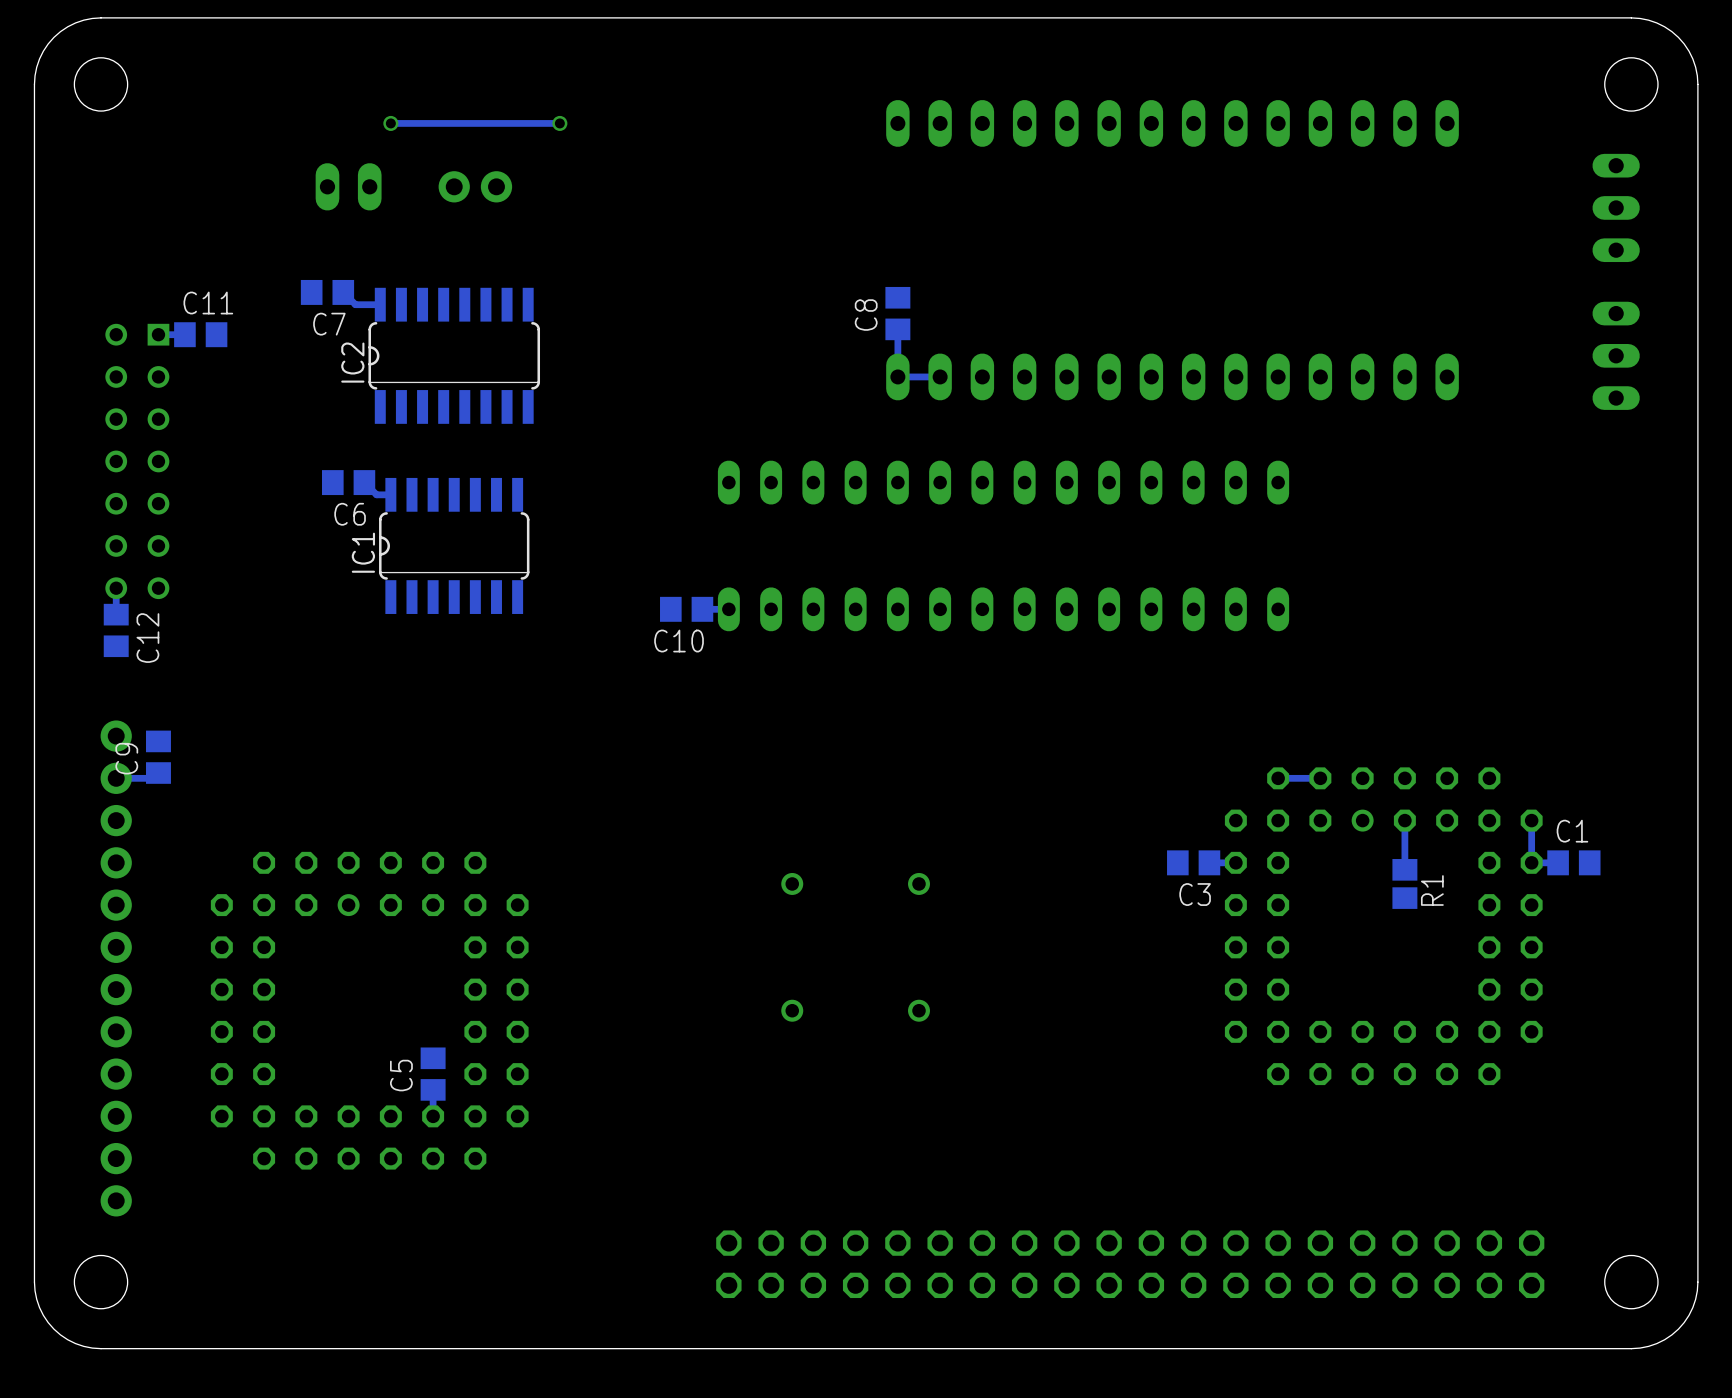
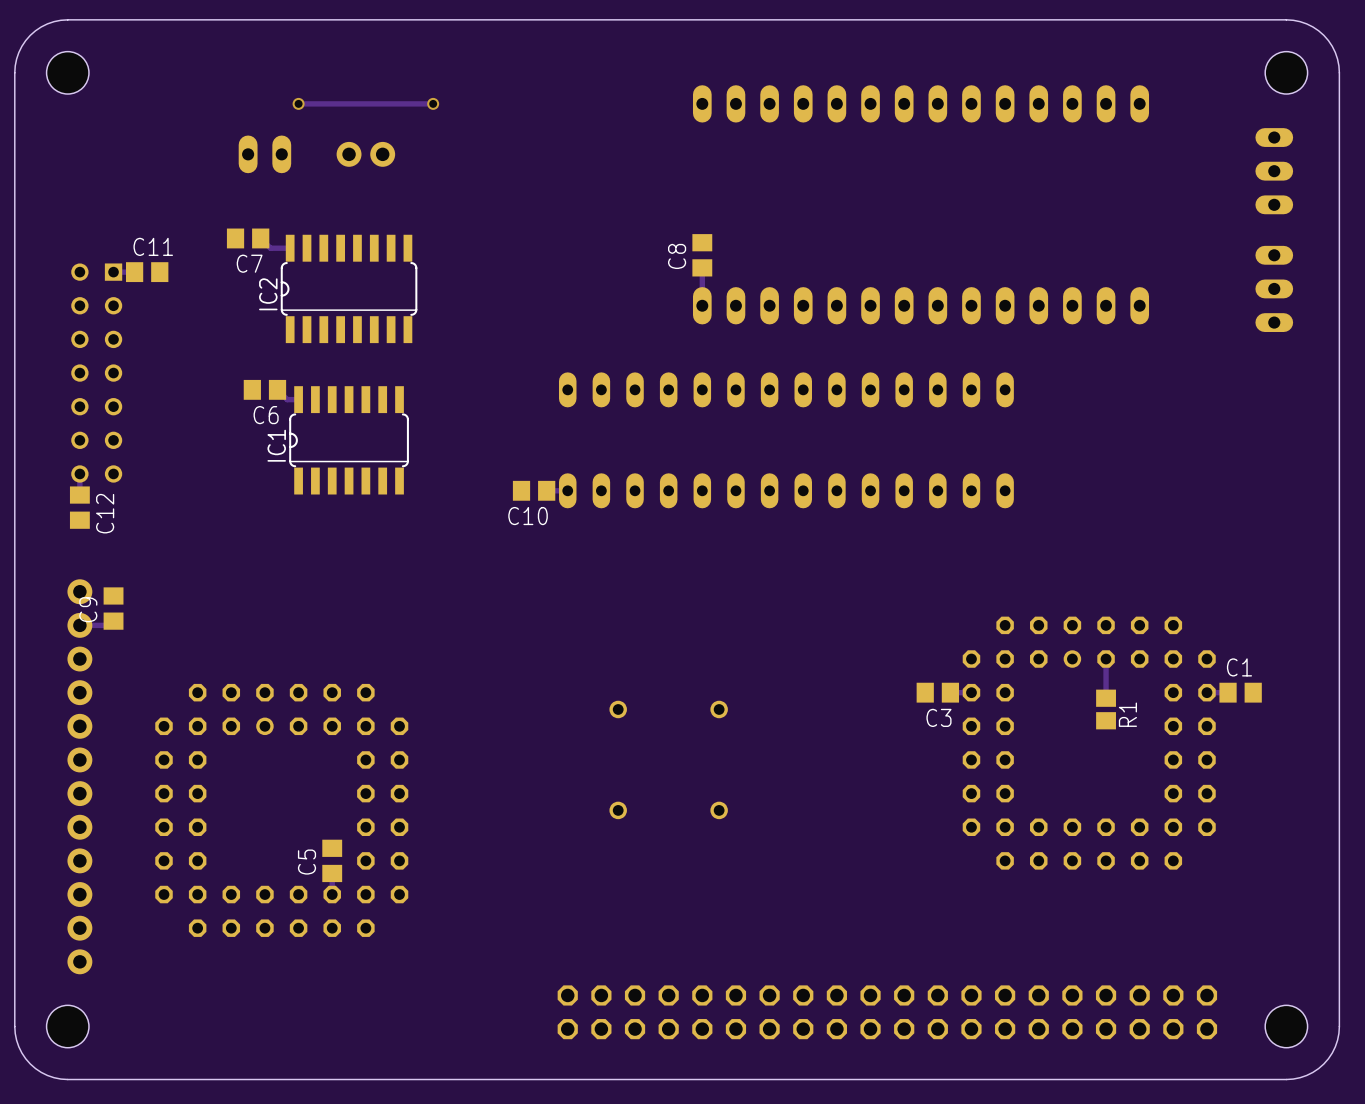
track: (940, 376) (897, 376) -> none
track: (1320, 778) (1278, 778) -> none
track: (1531, 820) (1531, 862) -> none

